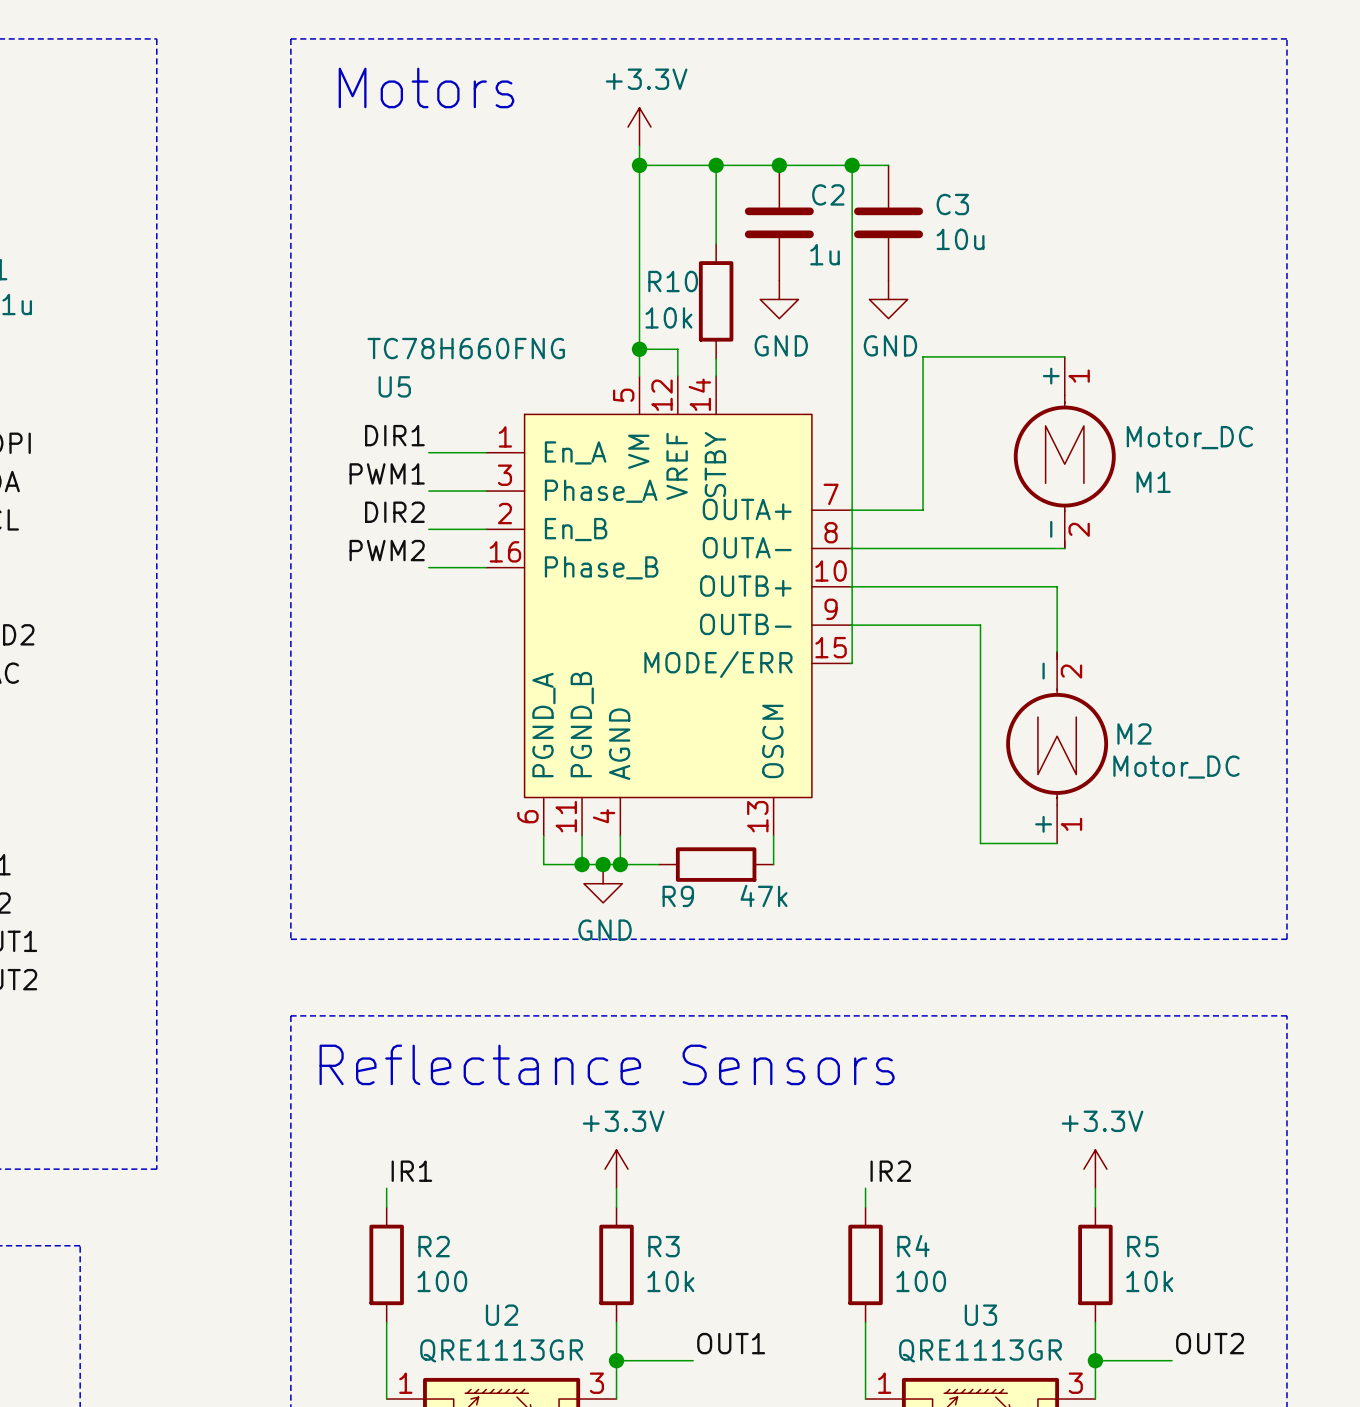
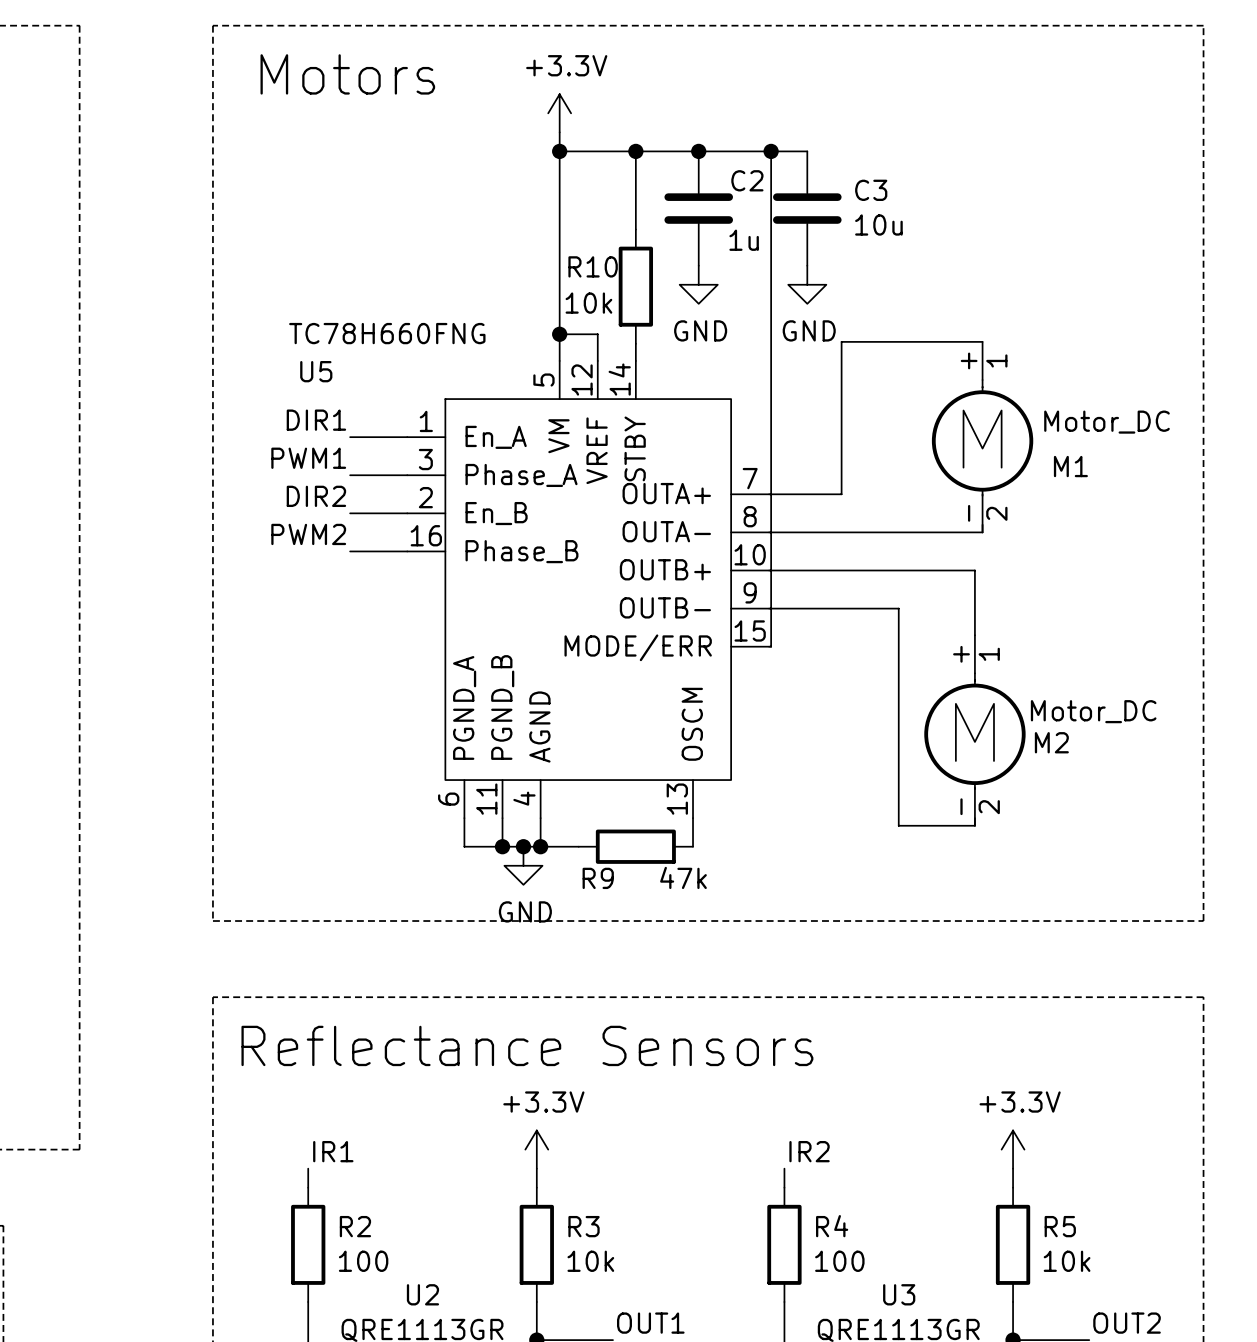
M2 rotation: 0° (1057, 728) -> 180° (974, 749)
M2 value position: Motor_DC (1176, 767) -> Motor_DC (1093, 711)

